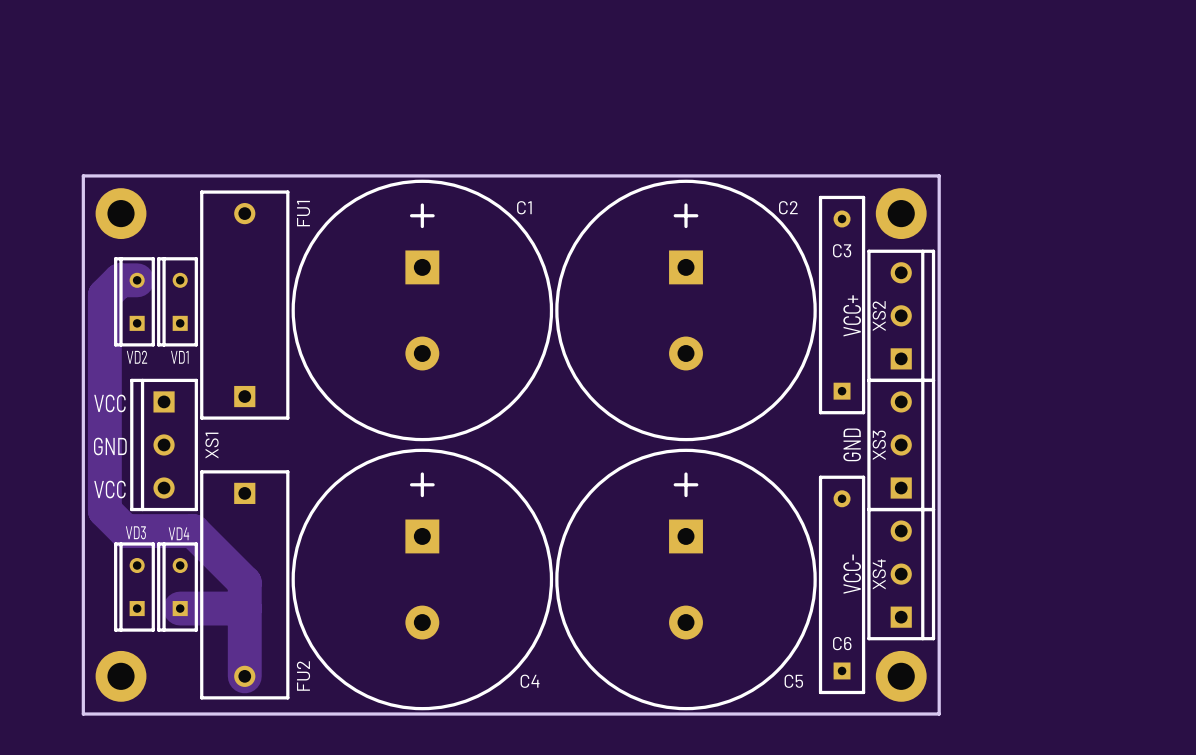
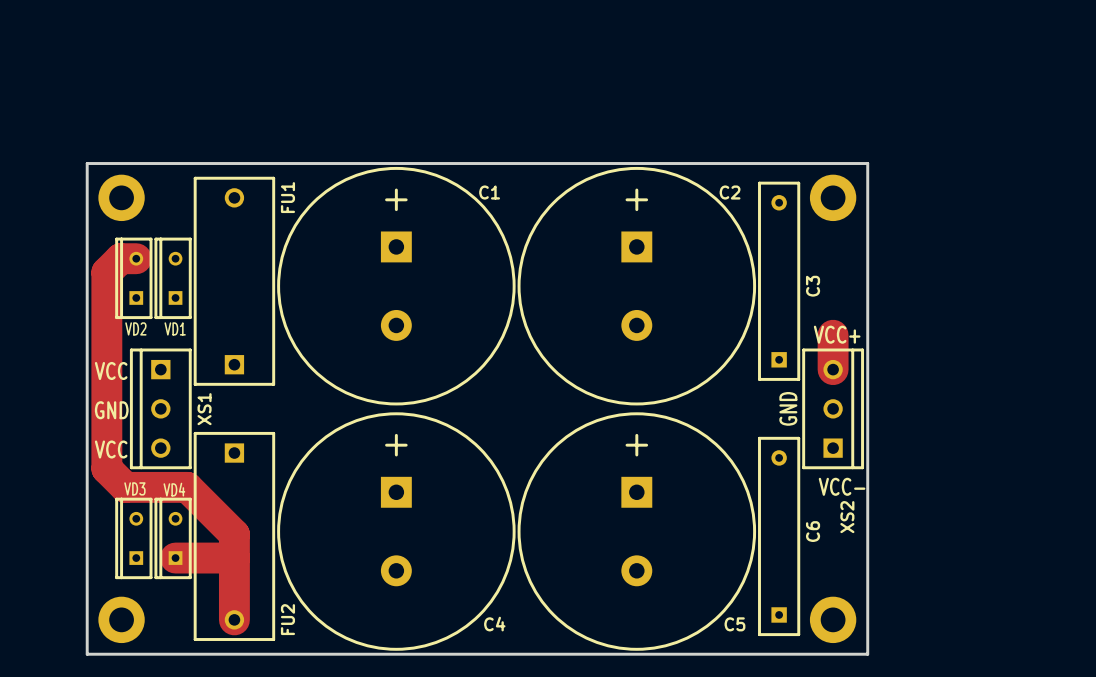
C3 name rotation: 0° (842, 250) -> 90° counterclockwise (813, 286)
C3 name position: C3 (842, 250) -> C3 (813, 286)
text rotation: 0° (852, 315) -> 90° clockwise (837, 334)
text position: VCC+ (852, 315) -> VCC+ (837, 334)
XS2: (901, 315) -> none
track: none -> (833, 335) (833, 369)
XS3 name: XS3 (879, 445) -> XS2 (847, 517)
text rotation: 0° (852, 574) -> 90° clockwise (842, 486)
text position: VCC- (852, 574) -> VCC- (842, 486)
XS4: (901, 574) -> none
C6 name rotation: 0° (842, 643) -> 90° counterclockwise (813, 531)
C6 name position: C6 (842, 643) -> C6 (813, 531)

